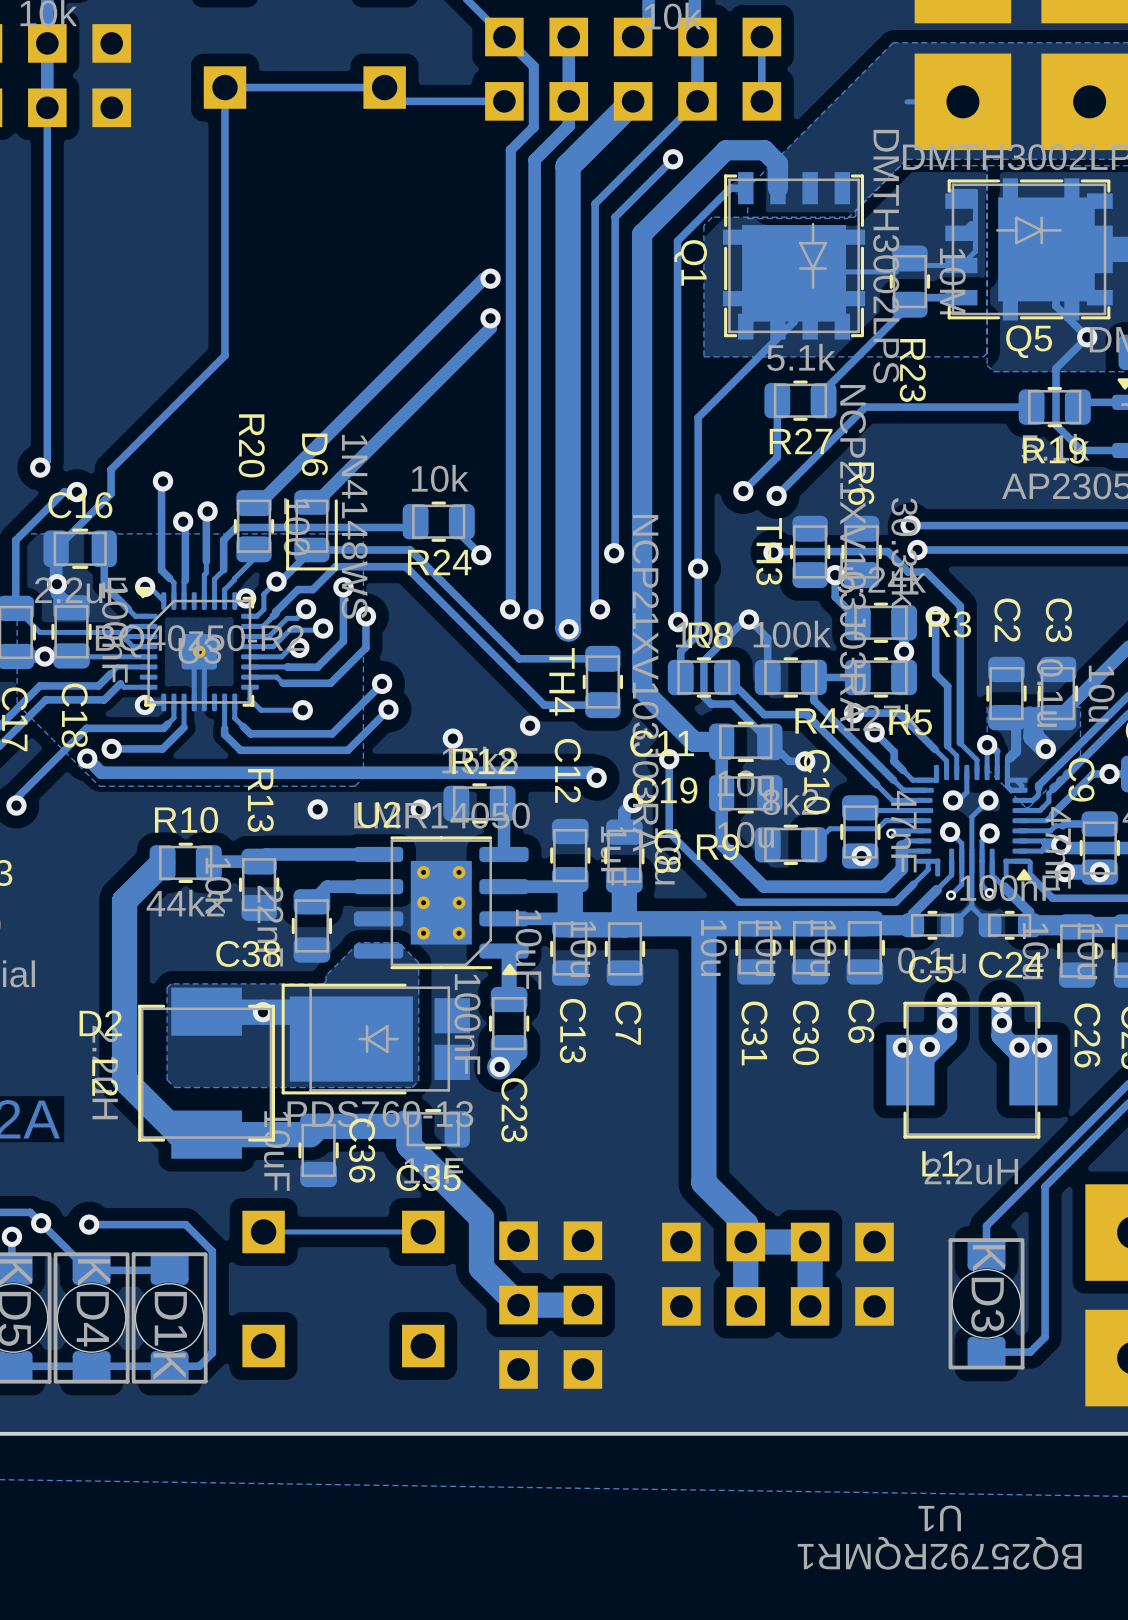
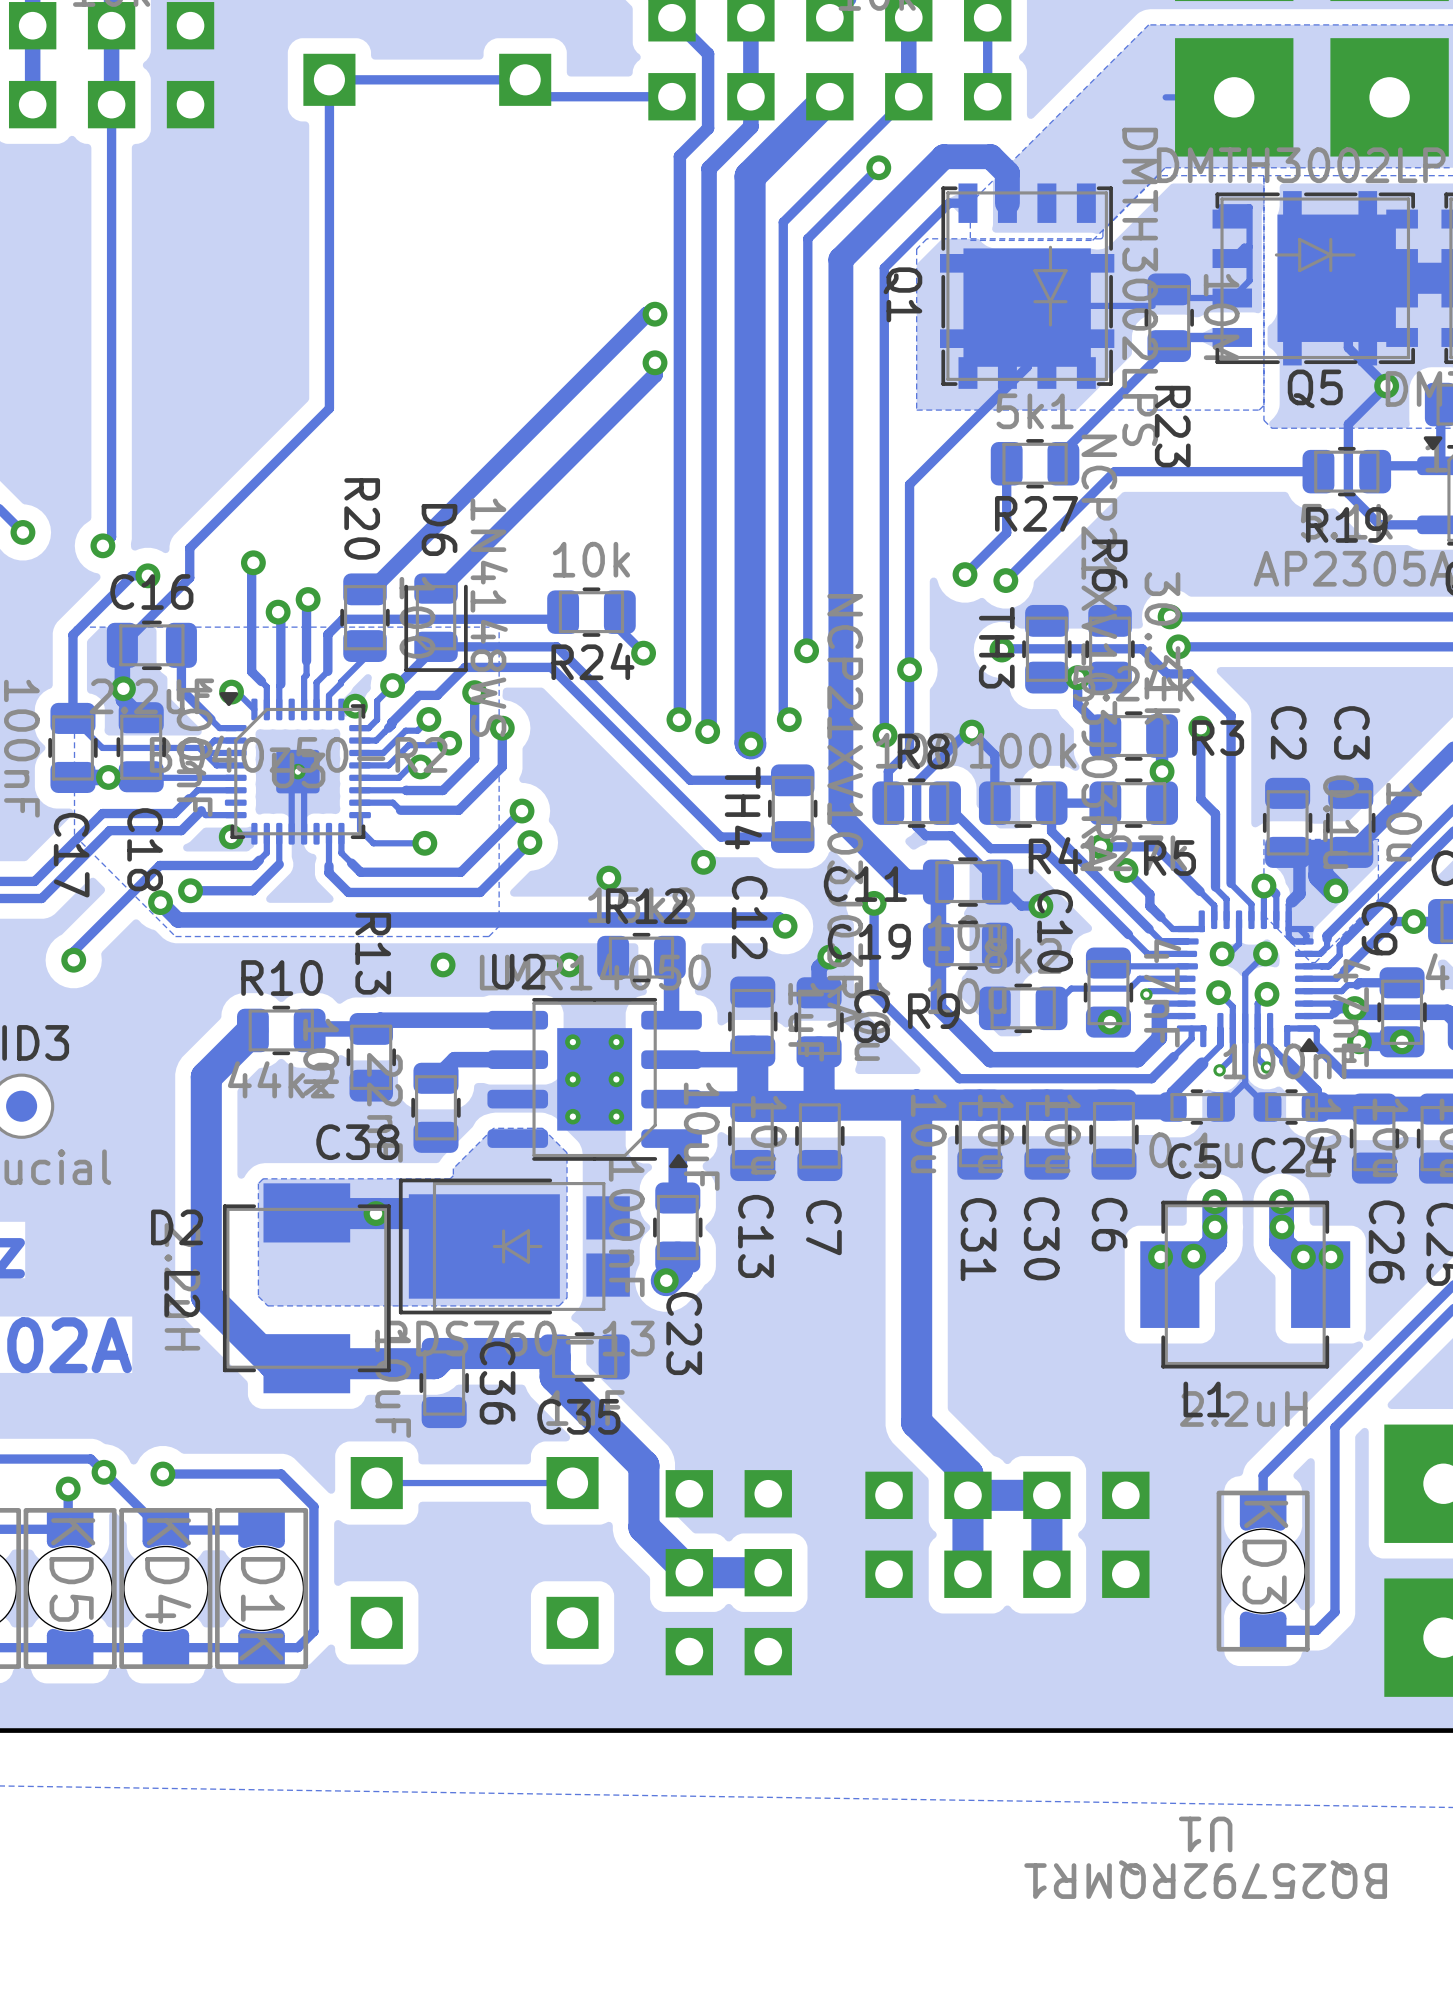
R27 value: 5.1k (801, 357) -> 5k1 (1035, 411)

